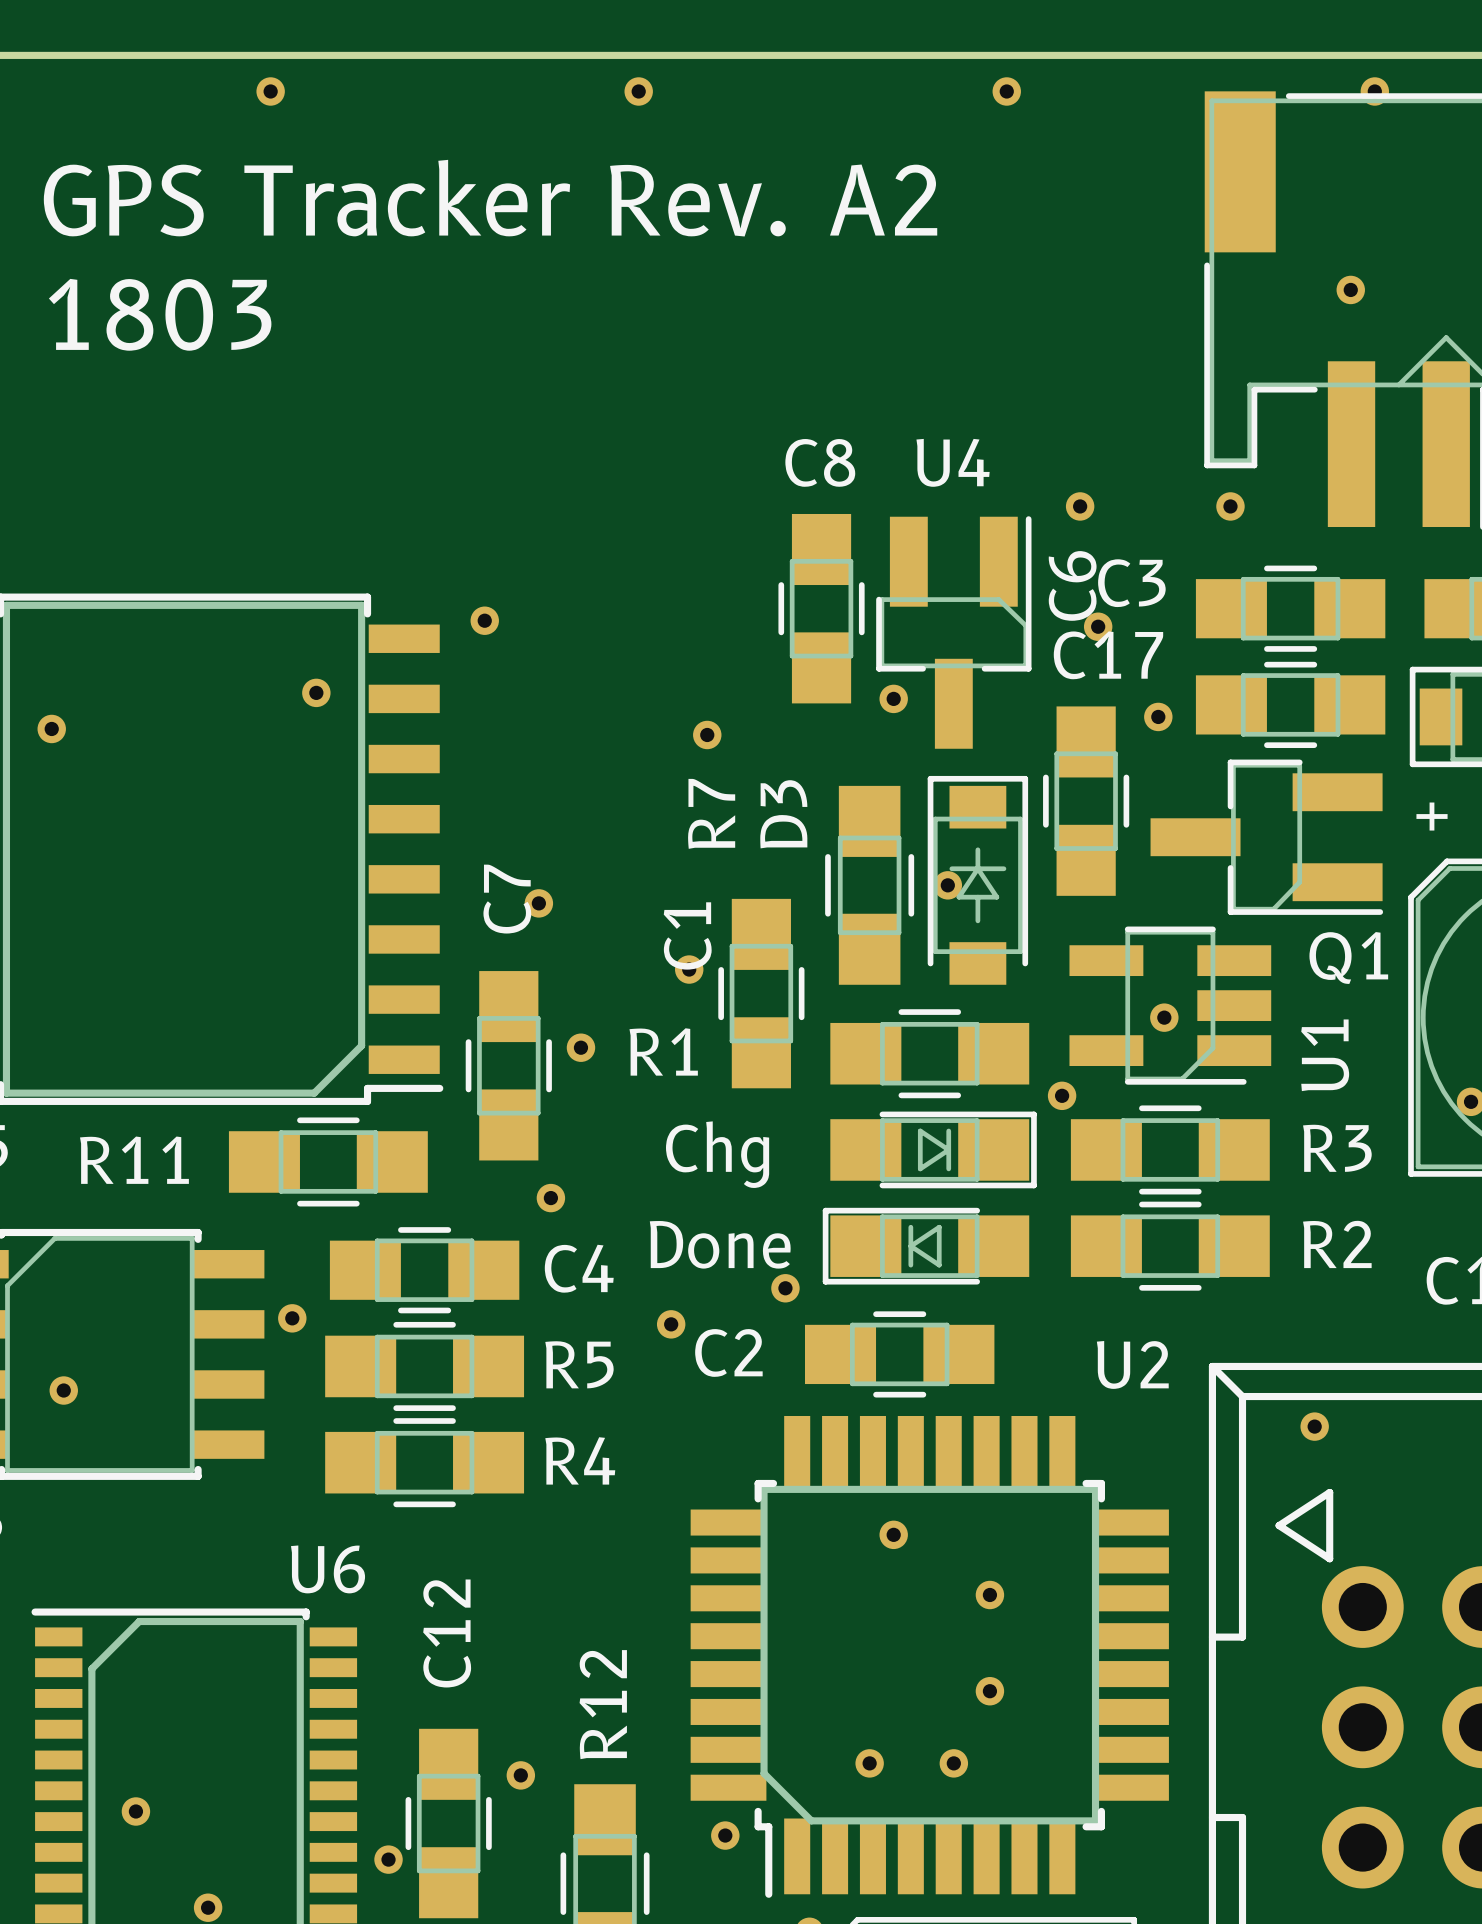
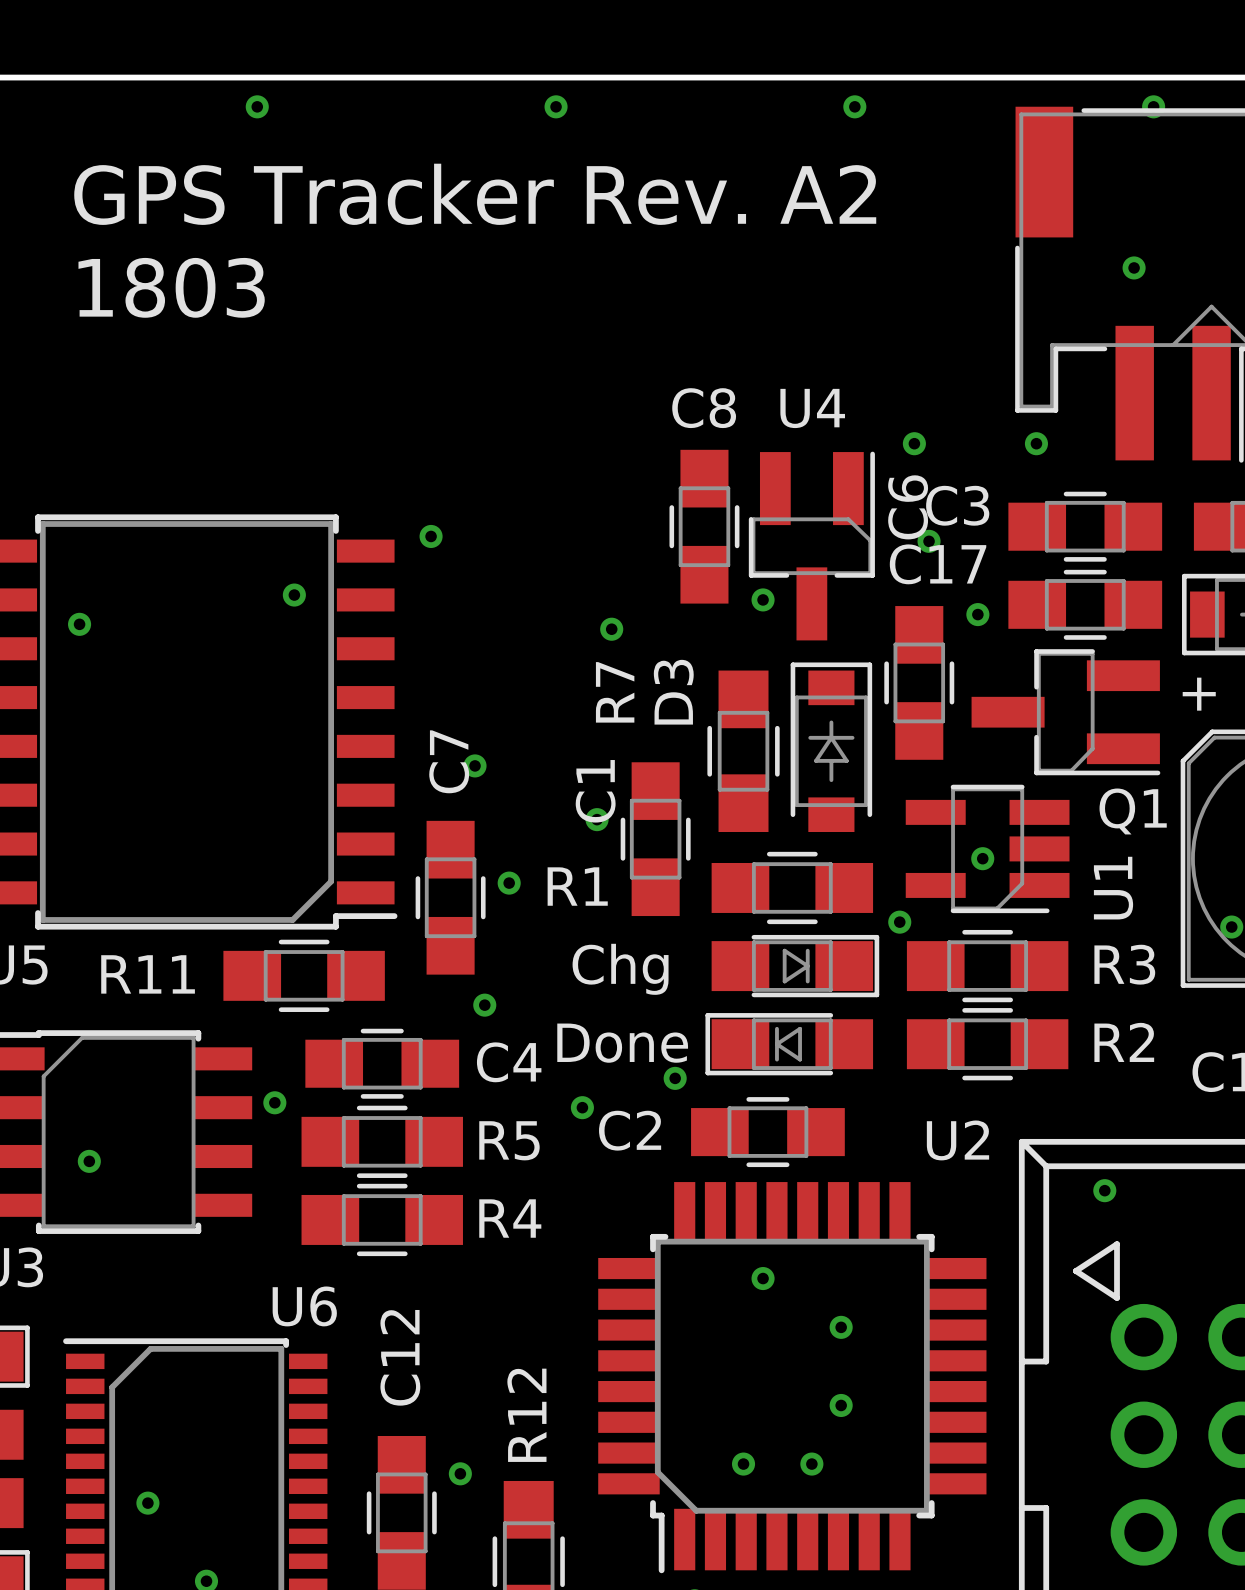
part: (947, 885) -> none
part: (725, 1835) -> none
part: (388, 1859) -> none

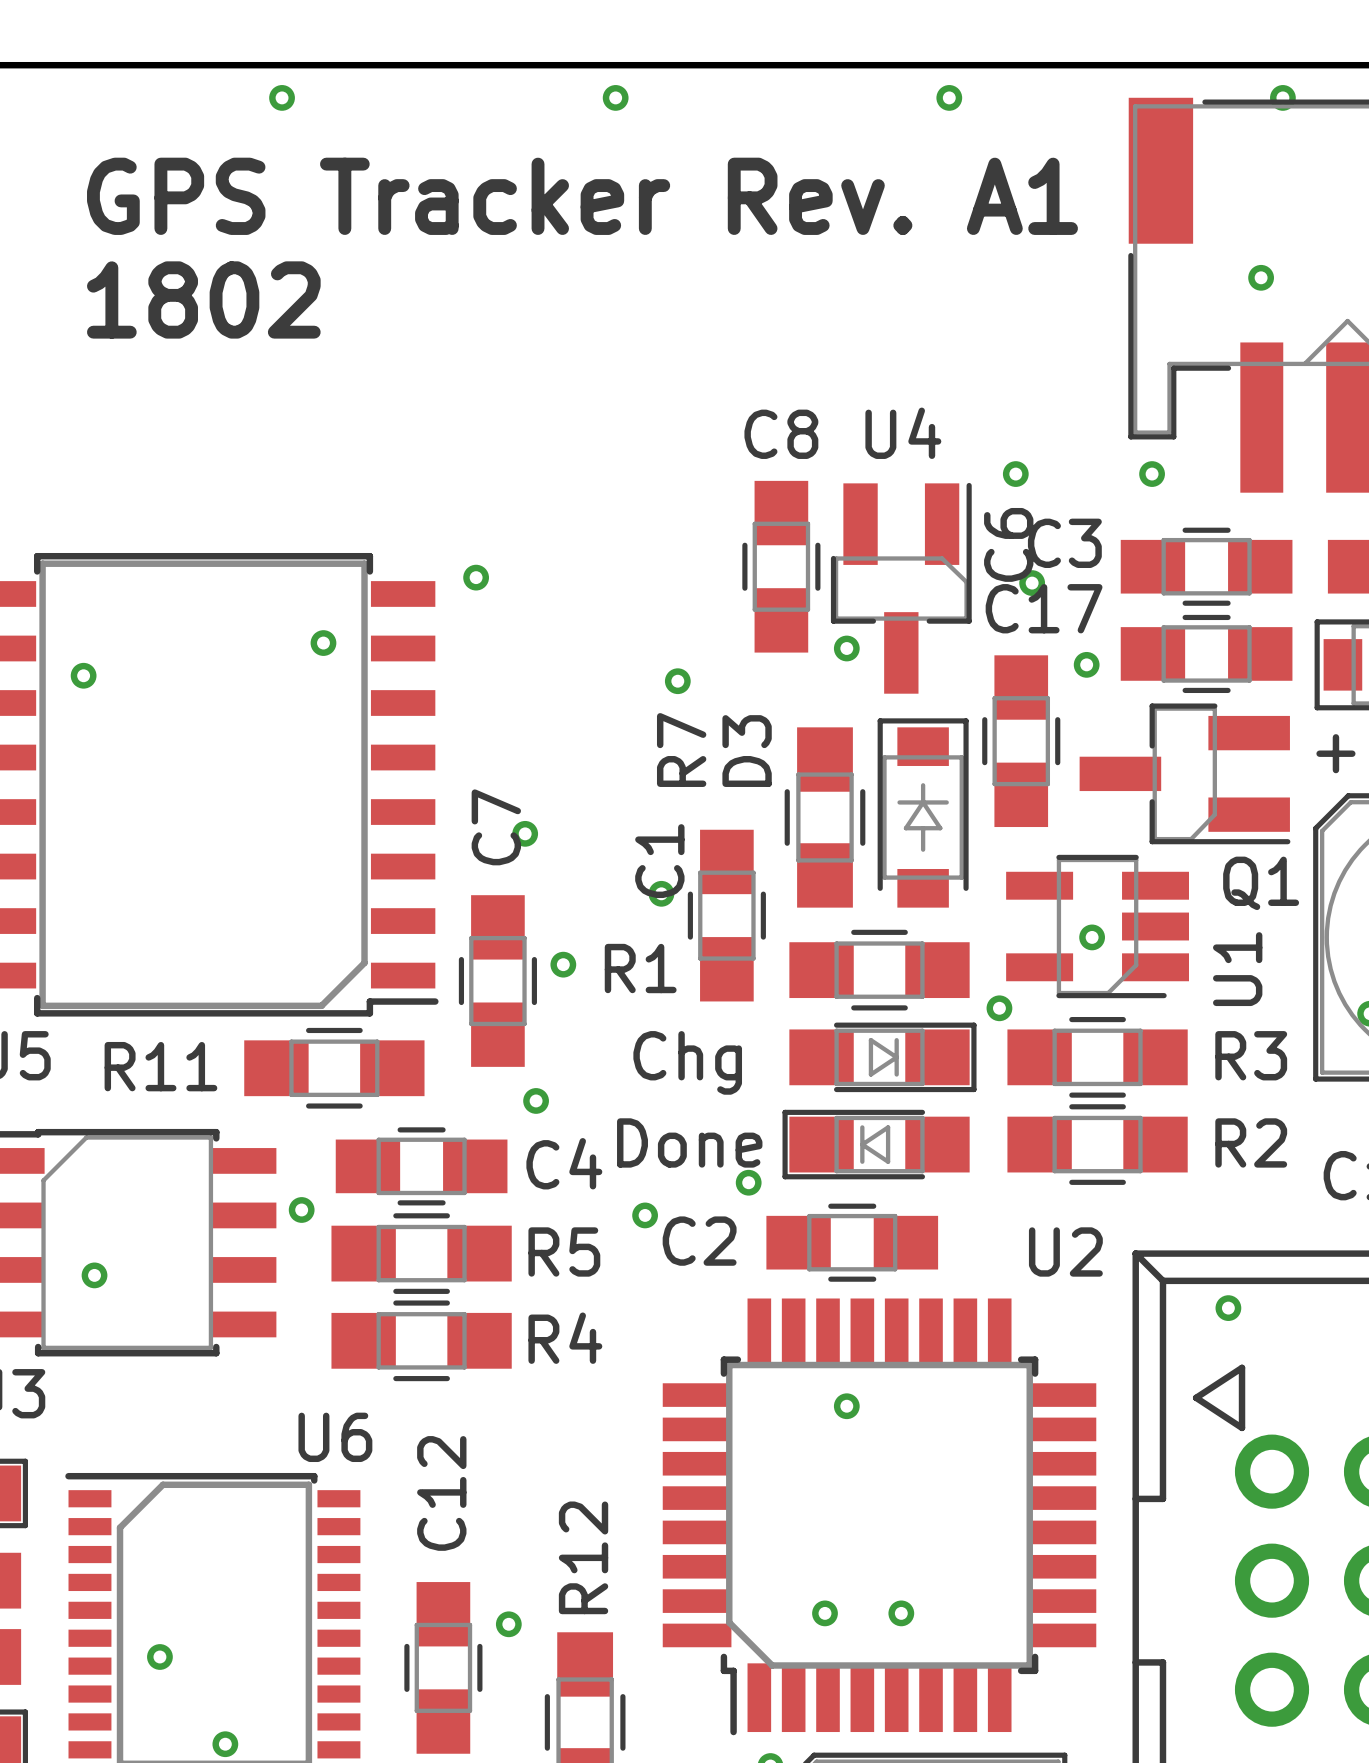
text: GPS Tracker Rev. A2 (475, 194) -> GPS Tracker Rev. A1 (582, 196)
text: 1803 (171, 287) -> 1802 (203, 299)
part: (841, 1327) -> none
part: (841, 1405) -> none

